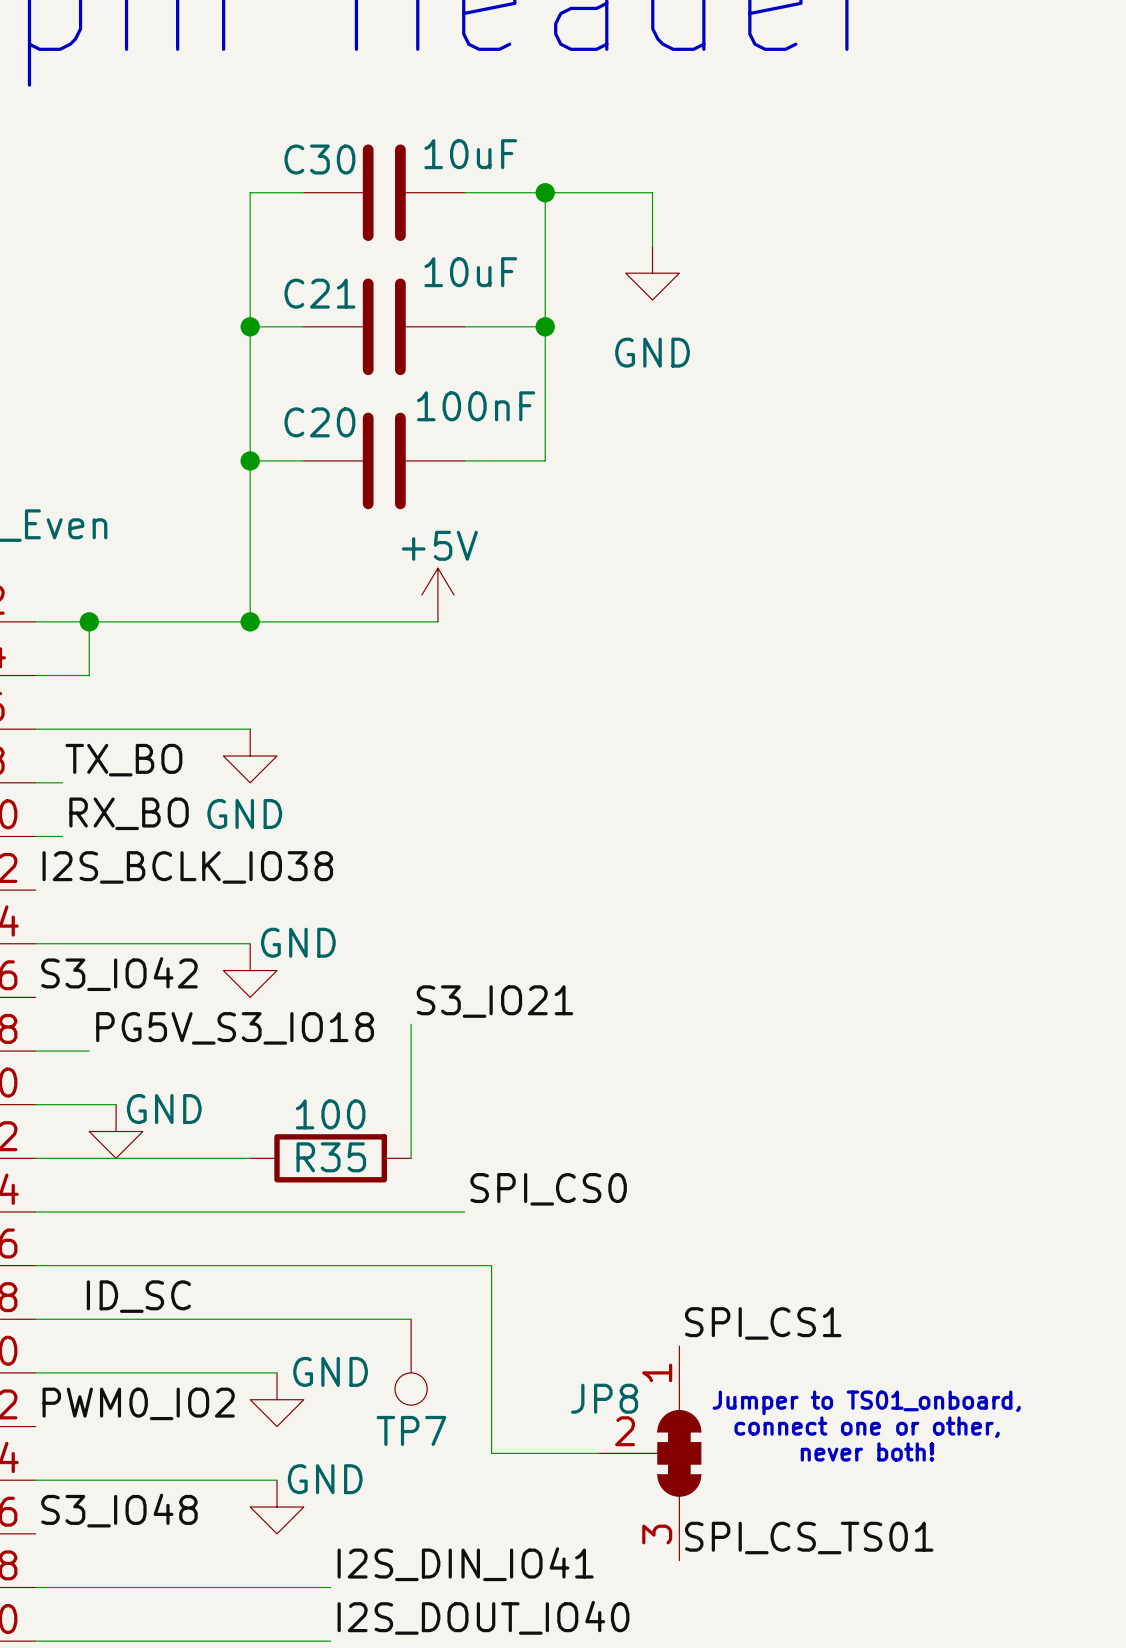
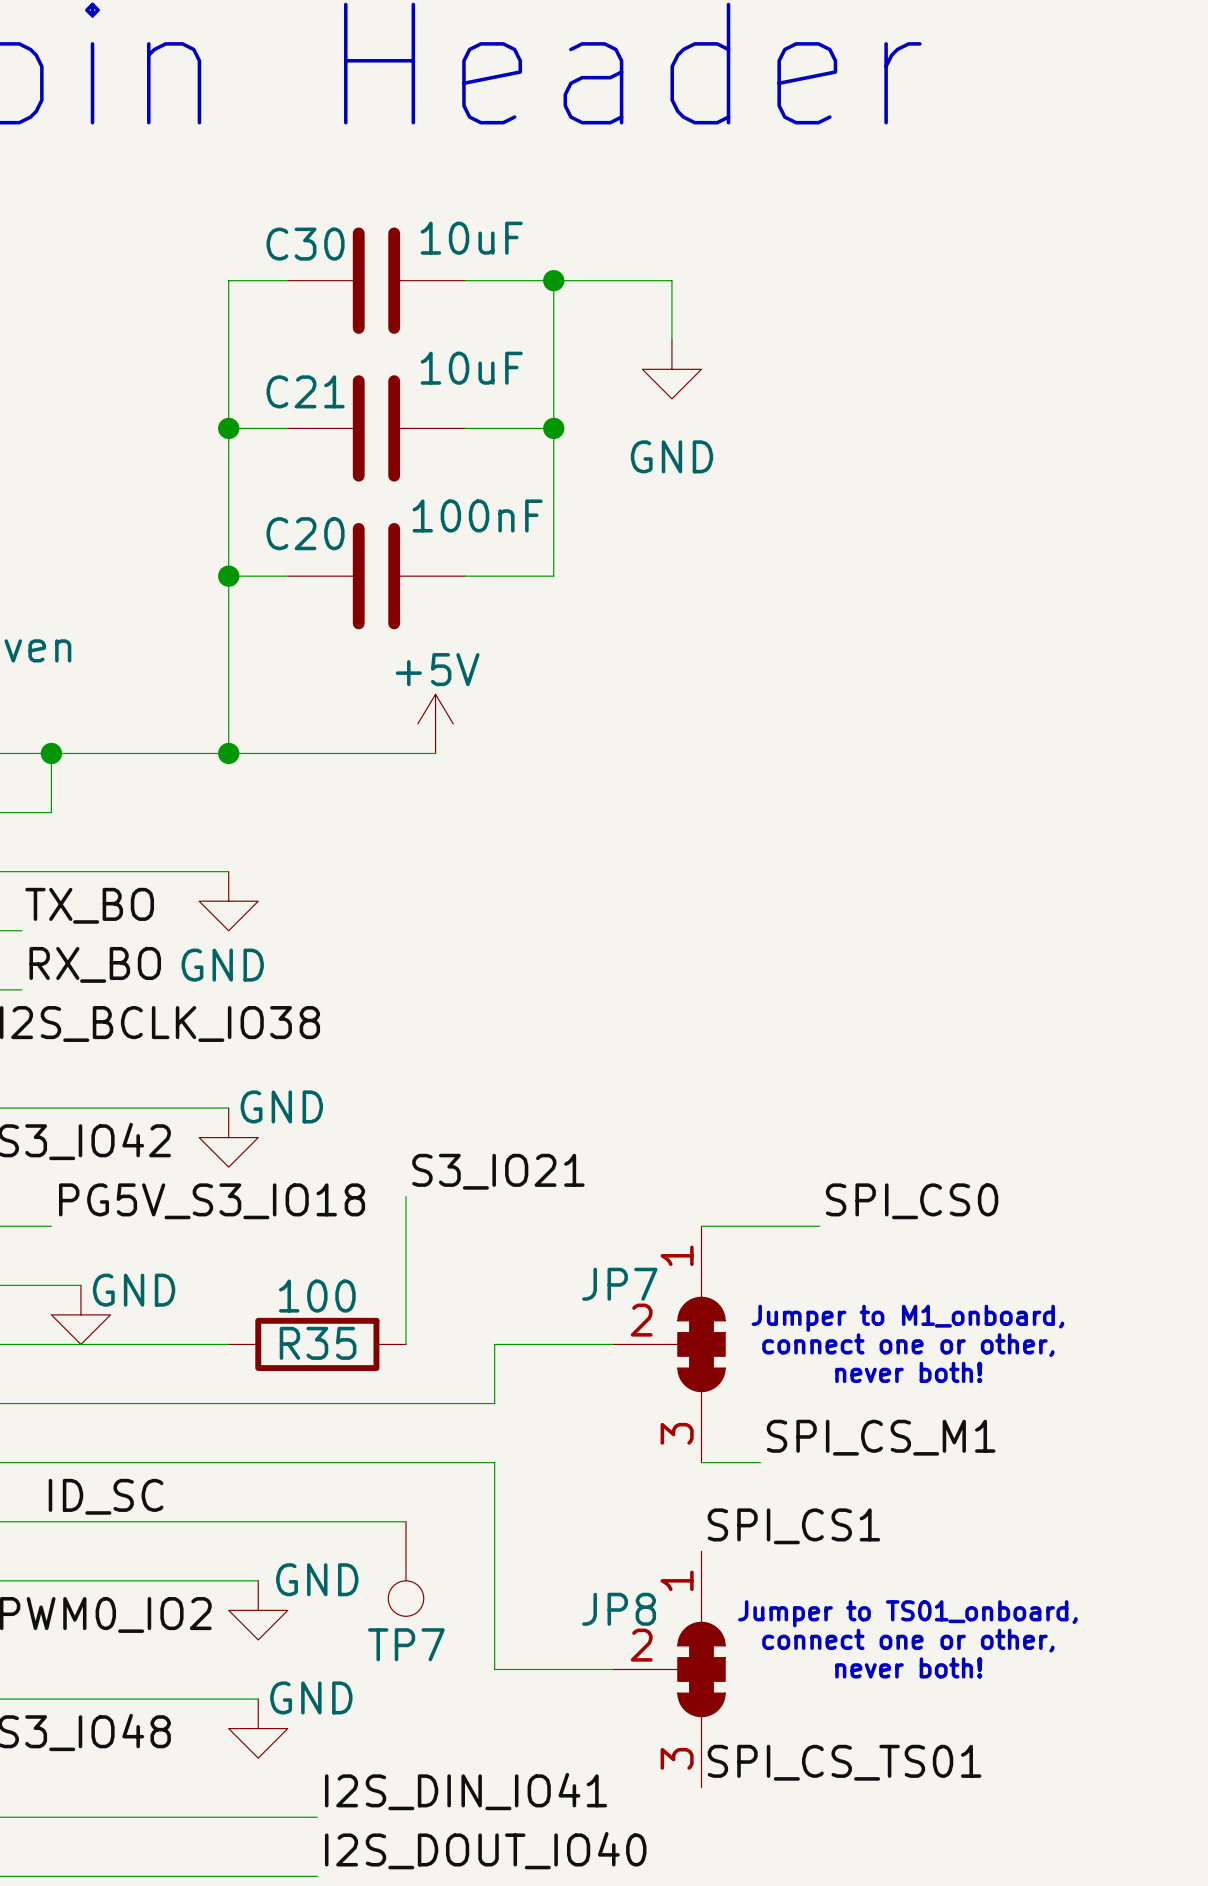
wire: none -> (701, 1226) (819, 1226)
text: none -> Jumper to M1_onboard, (907, 1318)
wire: none -> (612, 1344) (494, 1344) (494, 1403) (465, 1403)
JP7: none -> (668, 1344)
text: none -> connect one or other, (908, 1345)
text: none -> never both! (908, 1372)
label position: SPI_CS0 (548, 1189) -> SPI_CS0 (912, 1201)
label: none -> SPI_CS_M1 (881, 1437)
wire: none -> (701, 1462) (760, 1462)

